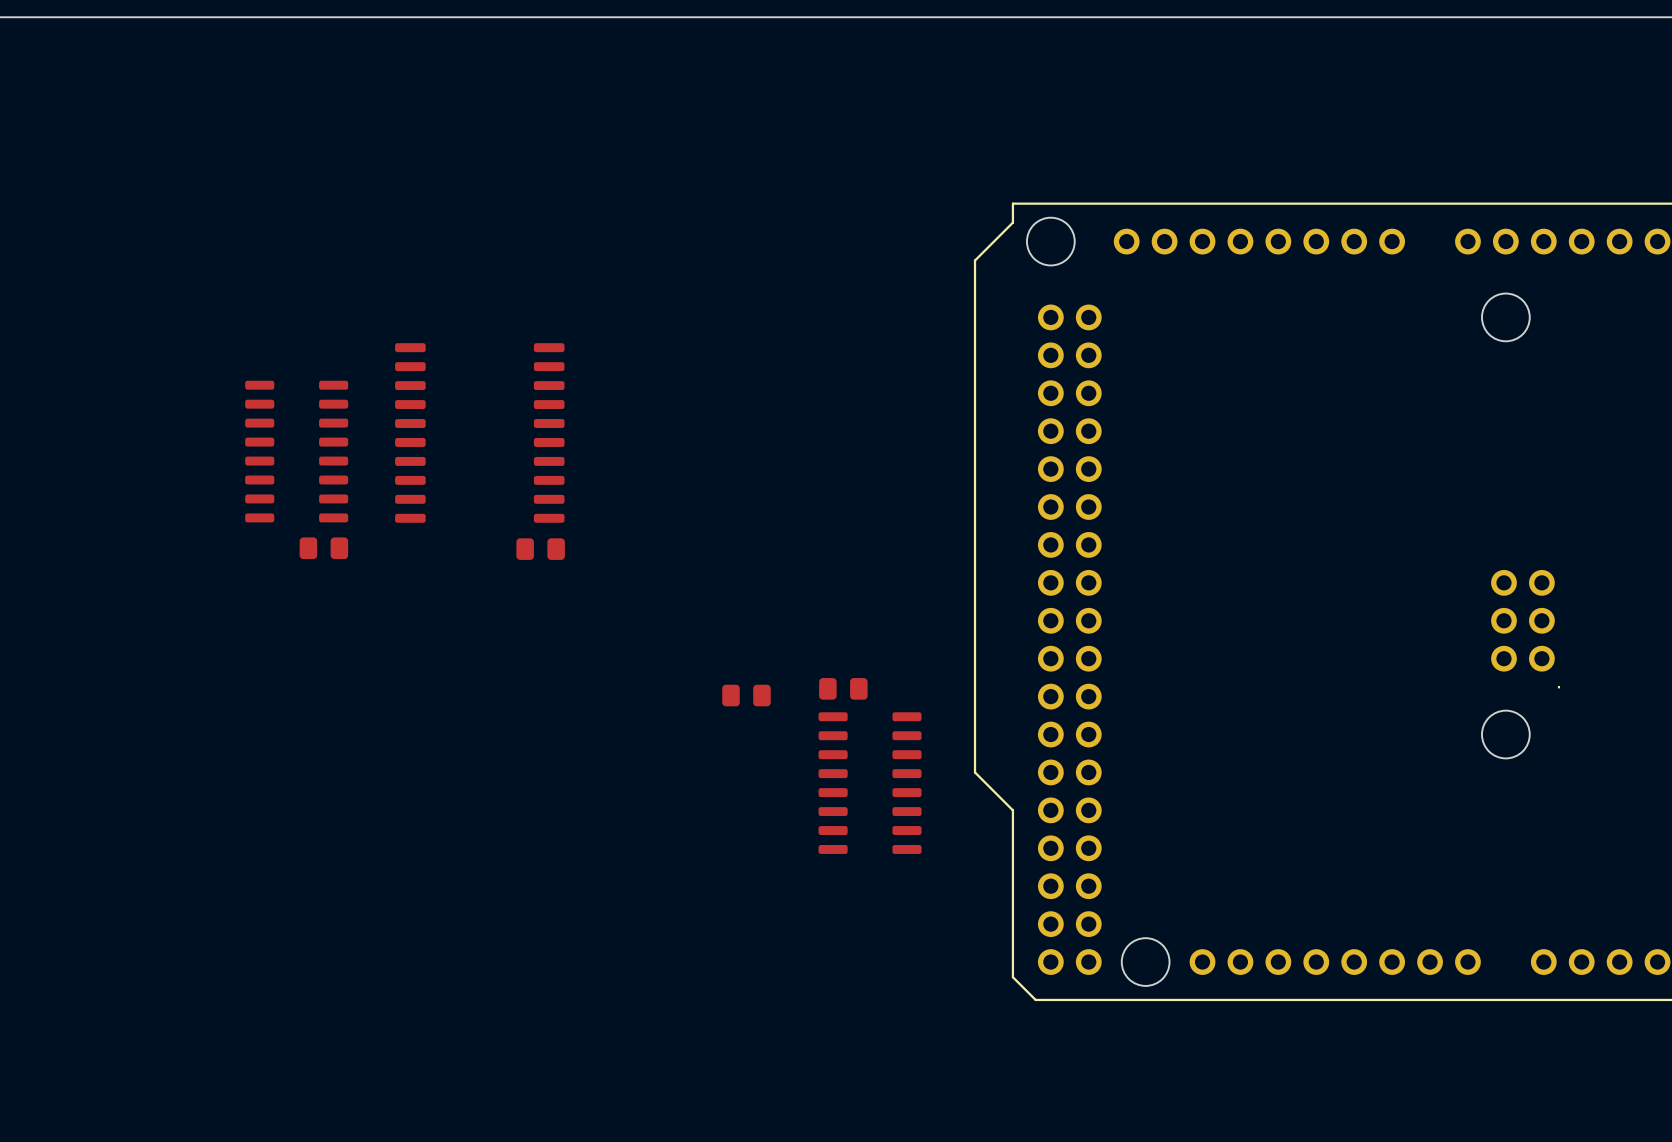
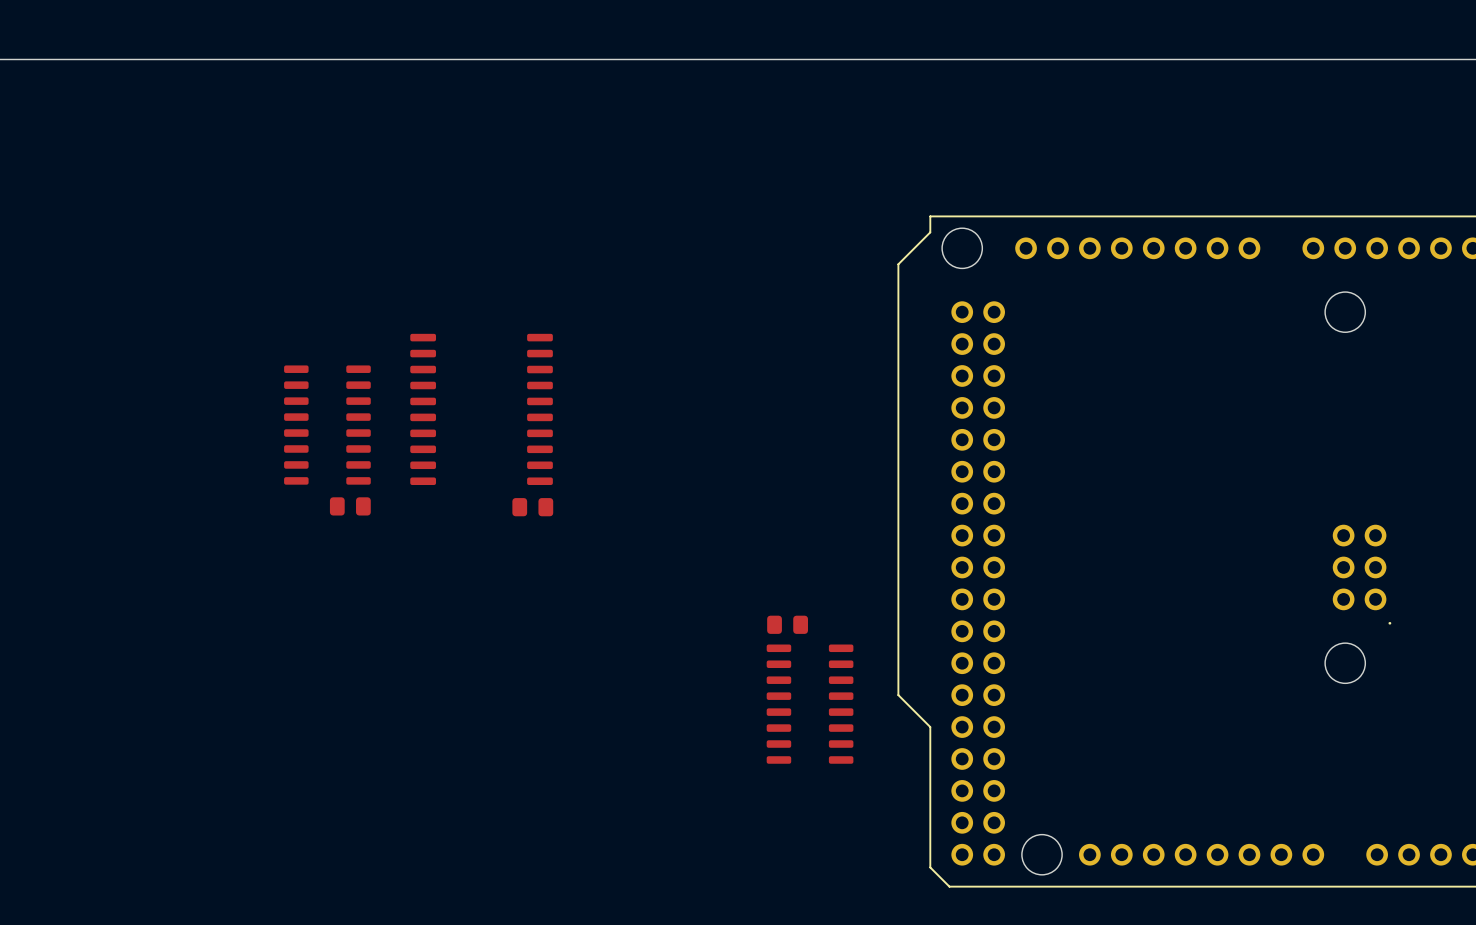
part: (746, 695) -> none

